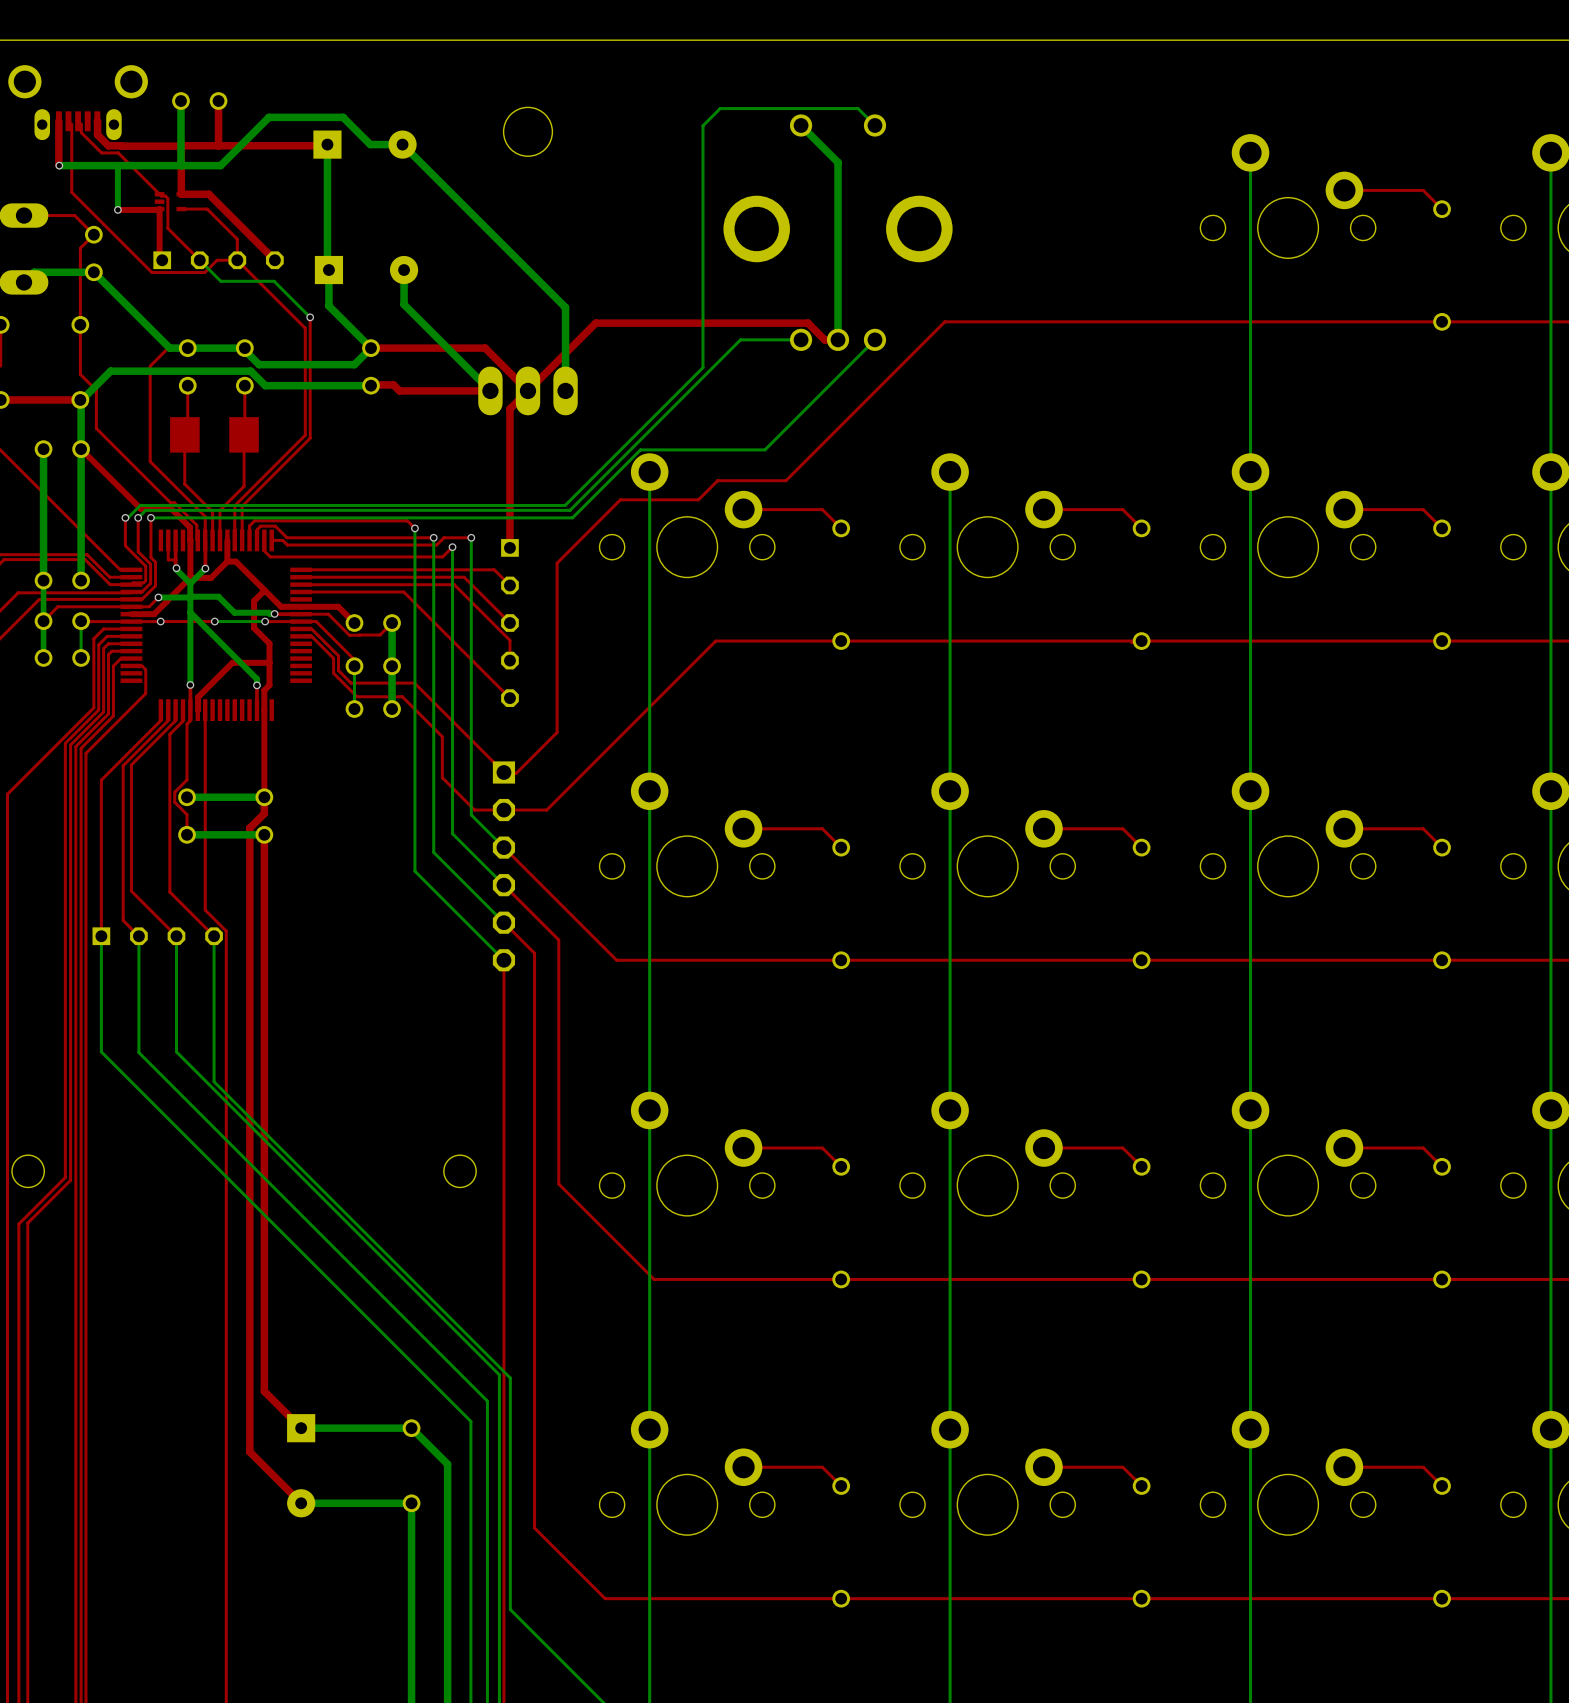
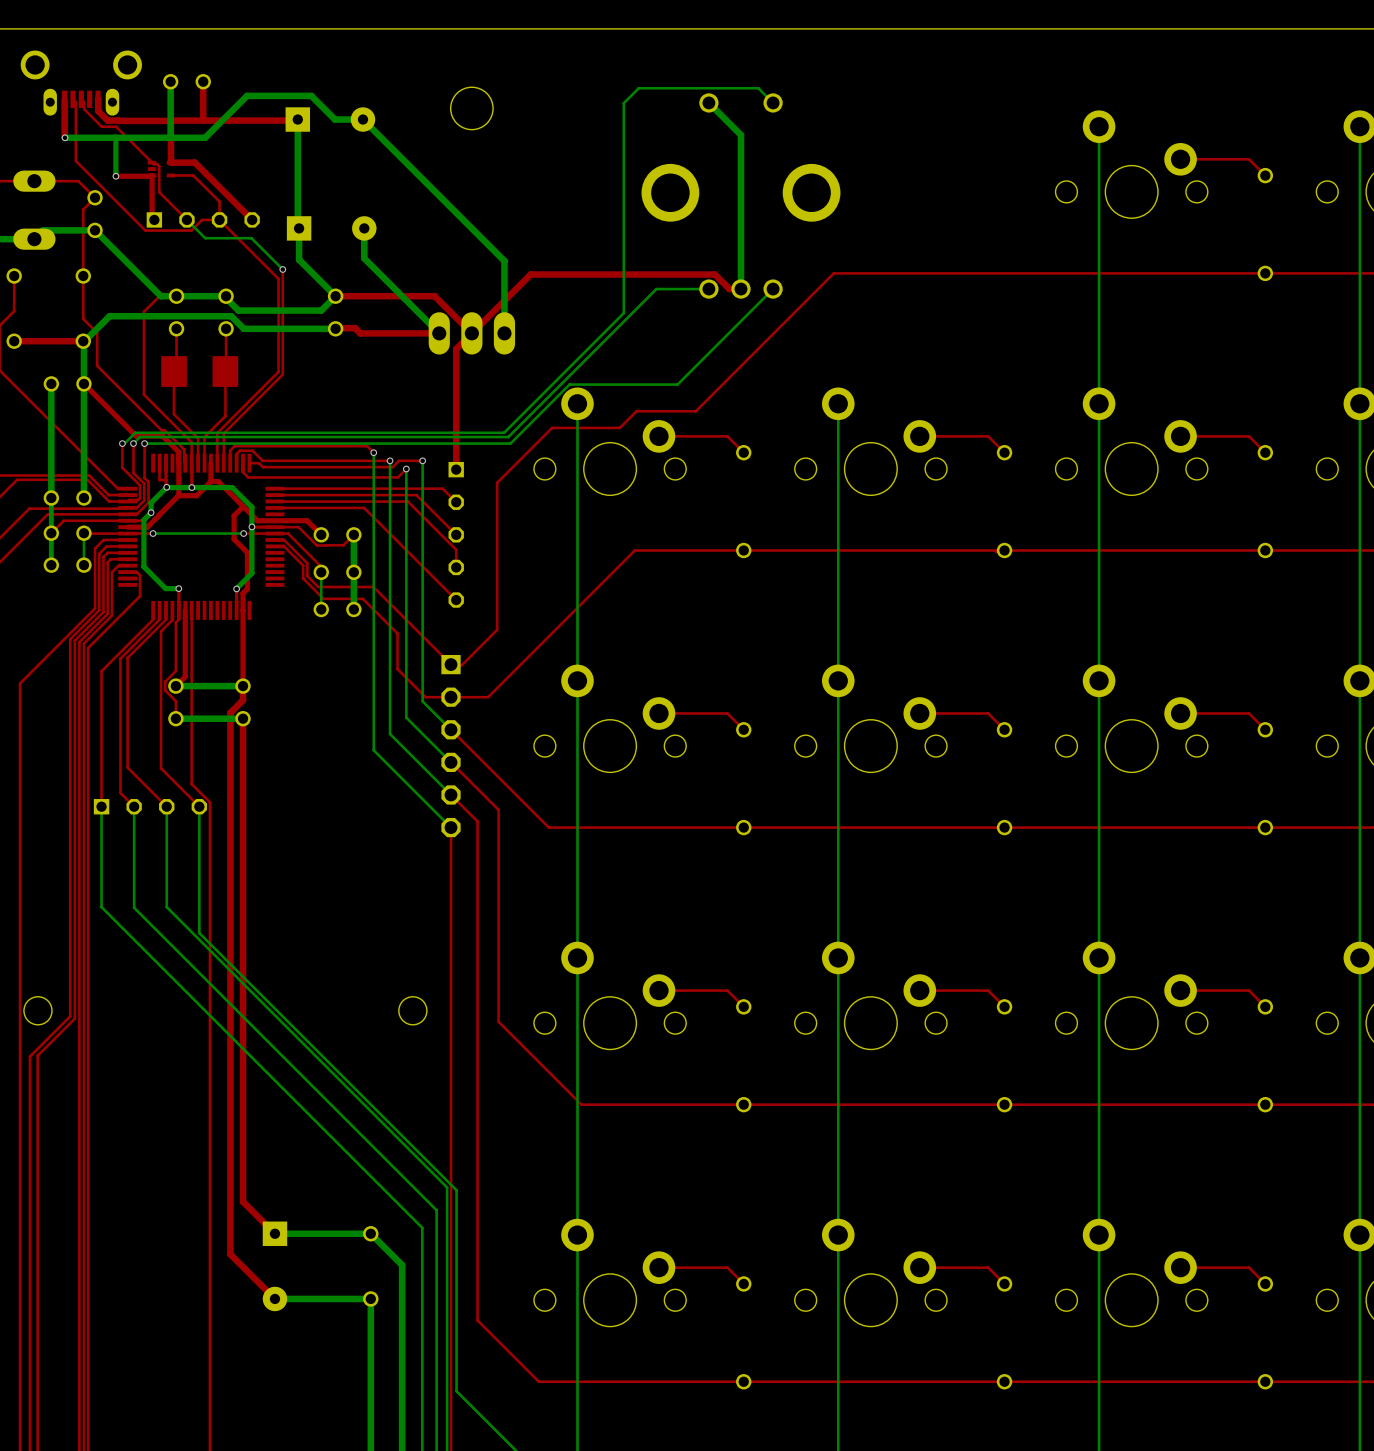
bottom track: (176, 568) (190, 583) -> none
bottom track: (205, 568) (190, 583) -> none
bottom track: (190, 583) (190, 684) -> (166, 487) (151, 502) (151, 512) (143, 519) (143, 566) (165, 588) (178, 588)
bottom track: (158, 597) (218, 596) (234, 612) (274, 613) -> none
bottom track: (190, 612) (256, 679) (256, 685) -> (167, 487) (232, 487) (251, 507) (251, 573) (236, 588)
bottom track: none -> (199, 533) (153, 533)
via: (214, 621) -> none
top track: (269, 662) (232, 662) (198, 697) (197, 710) -> (175, 686) (185, 676) (185, 610)

